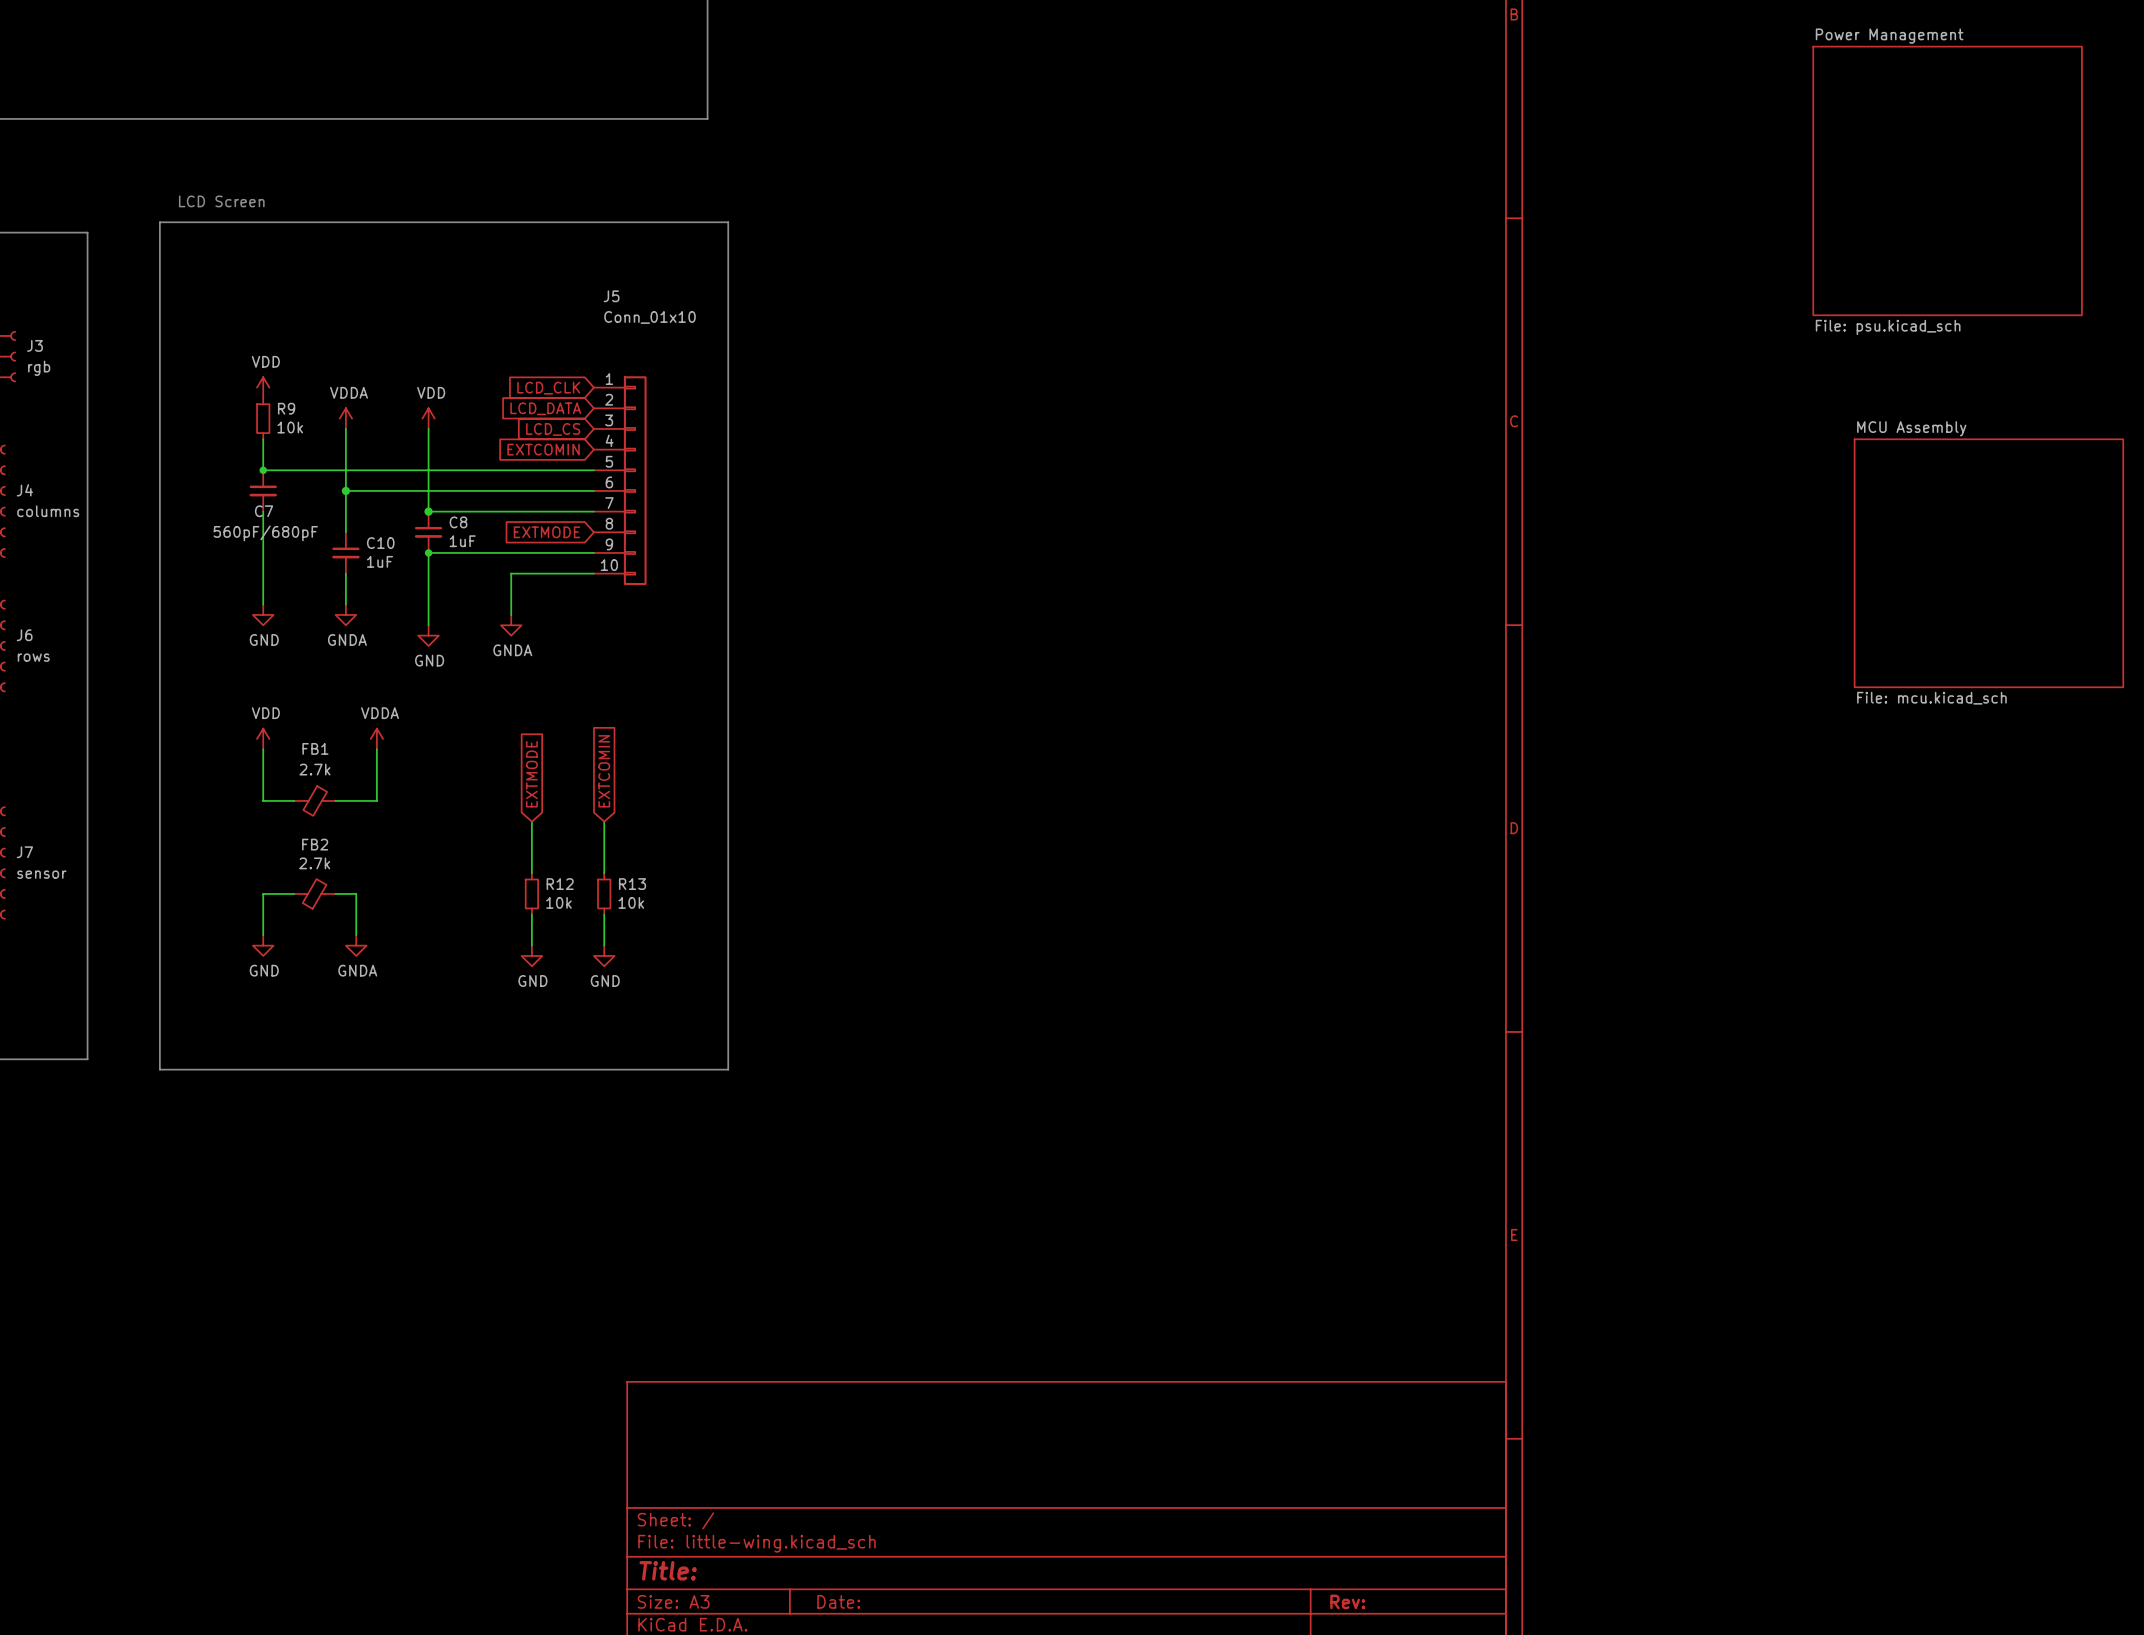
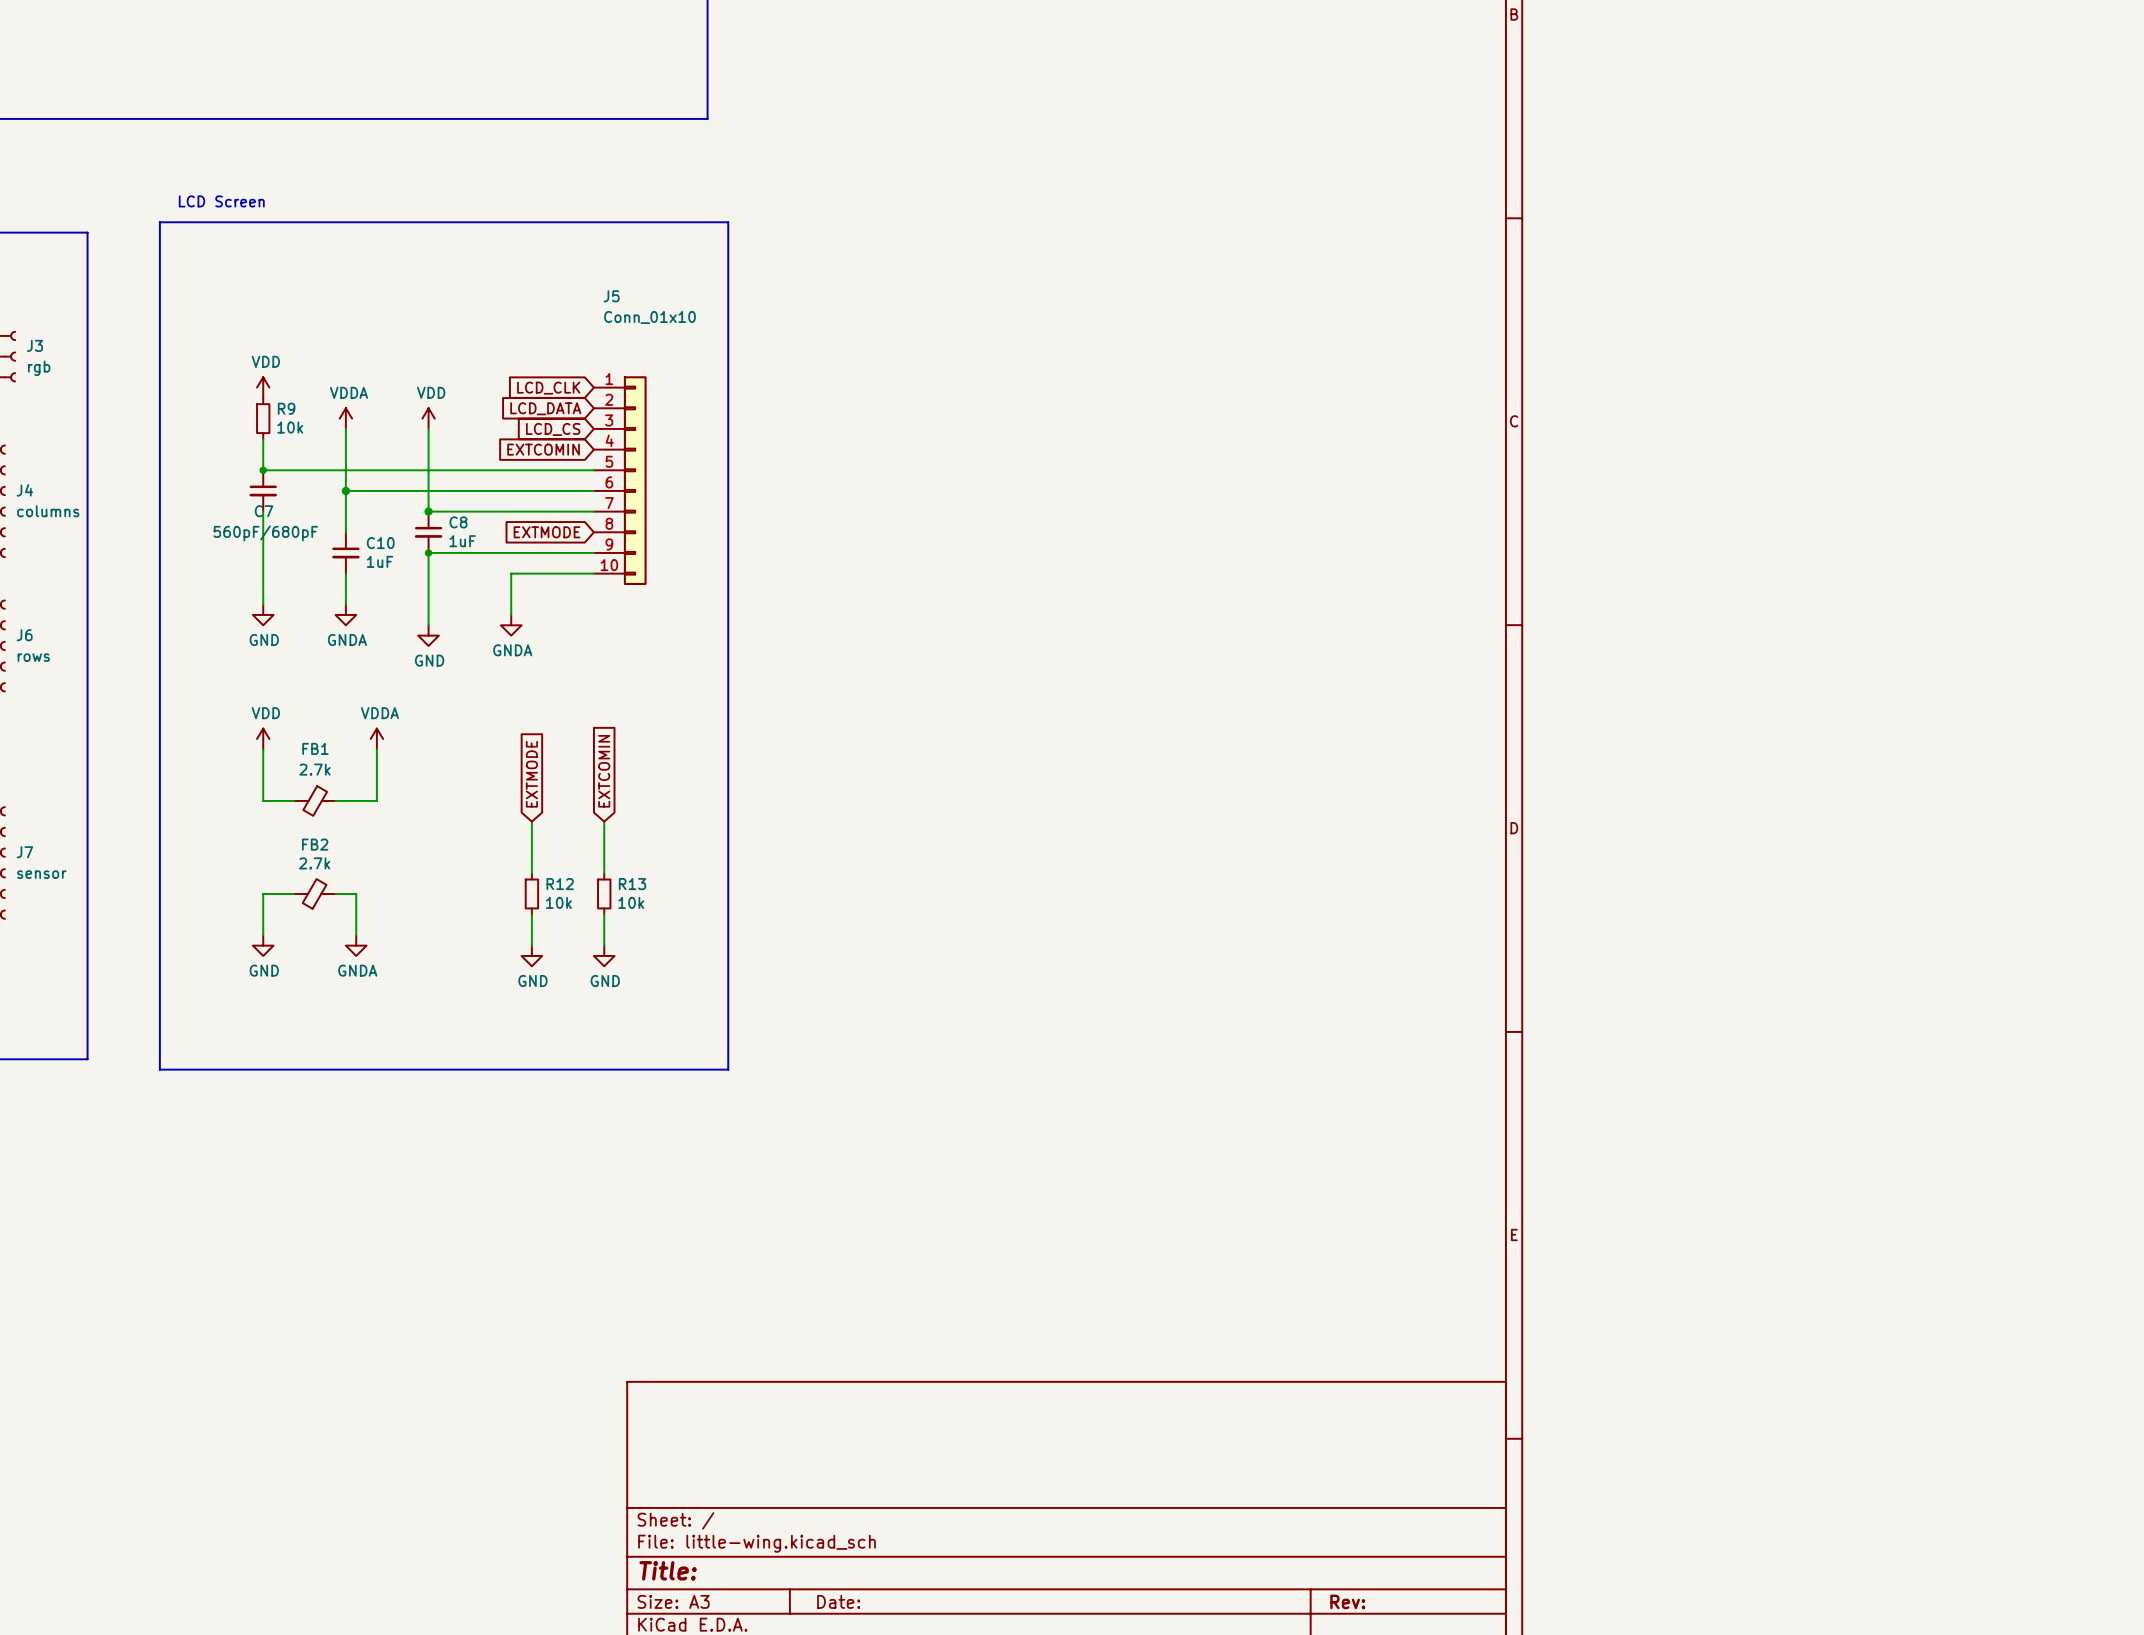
sheet Power Management: File: psu.kicad_sch (1947, 180) -> none
sheet MCU Assembly: File: mcu.kicad_sch (1988, 563) -> none

